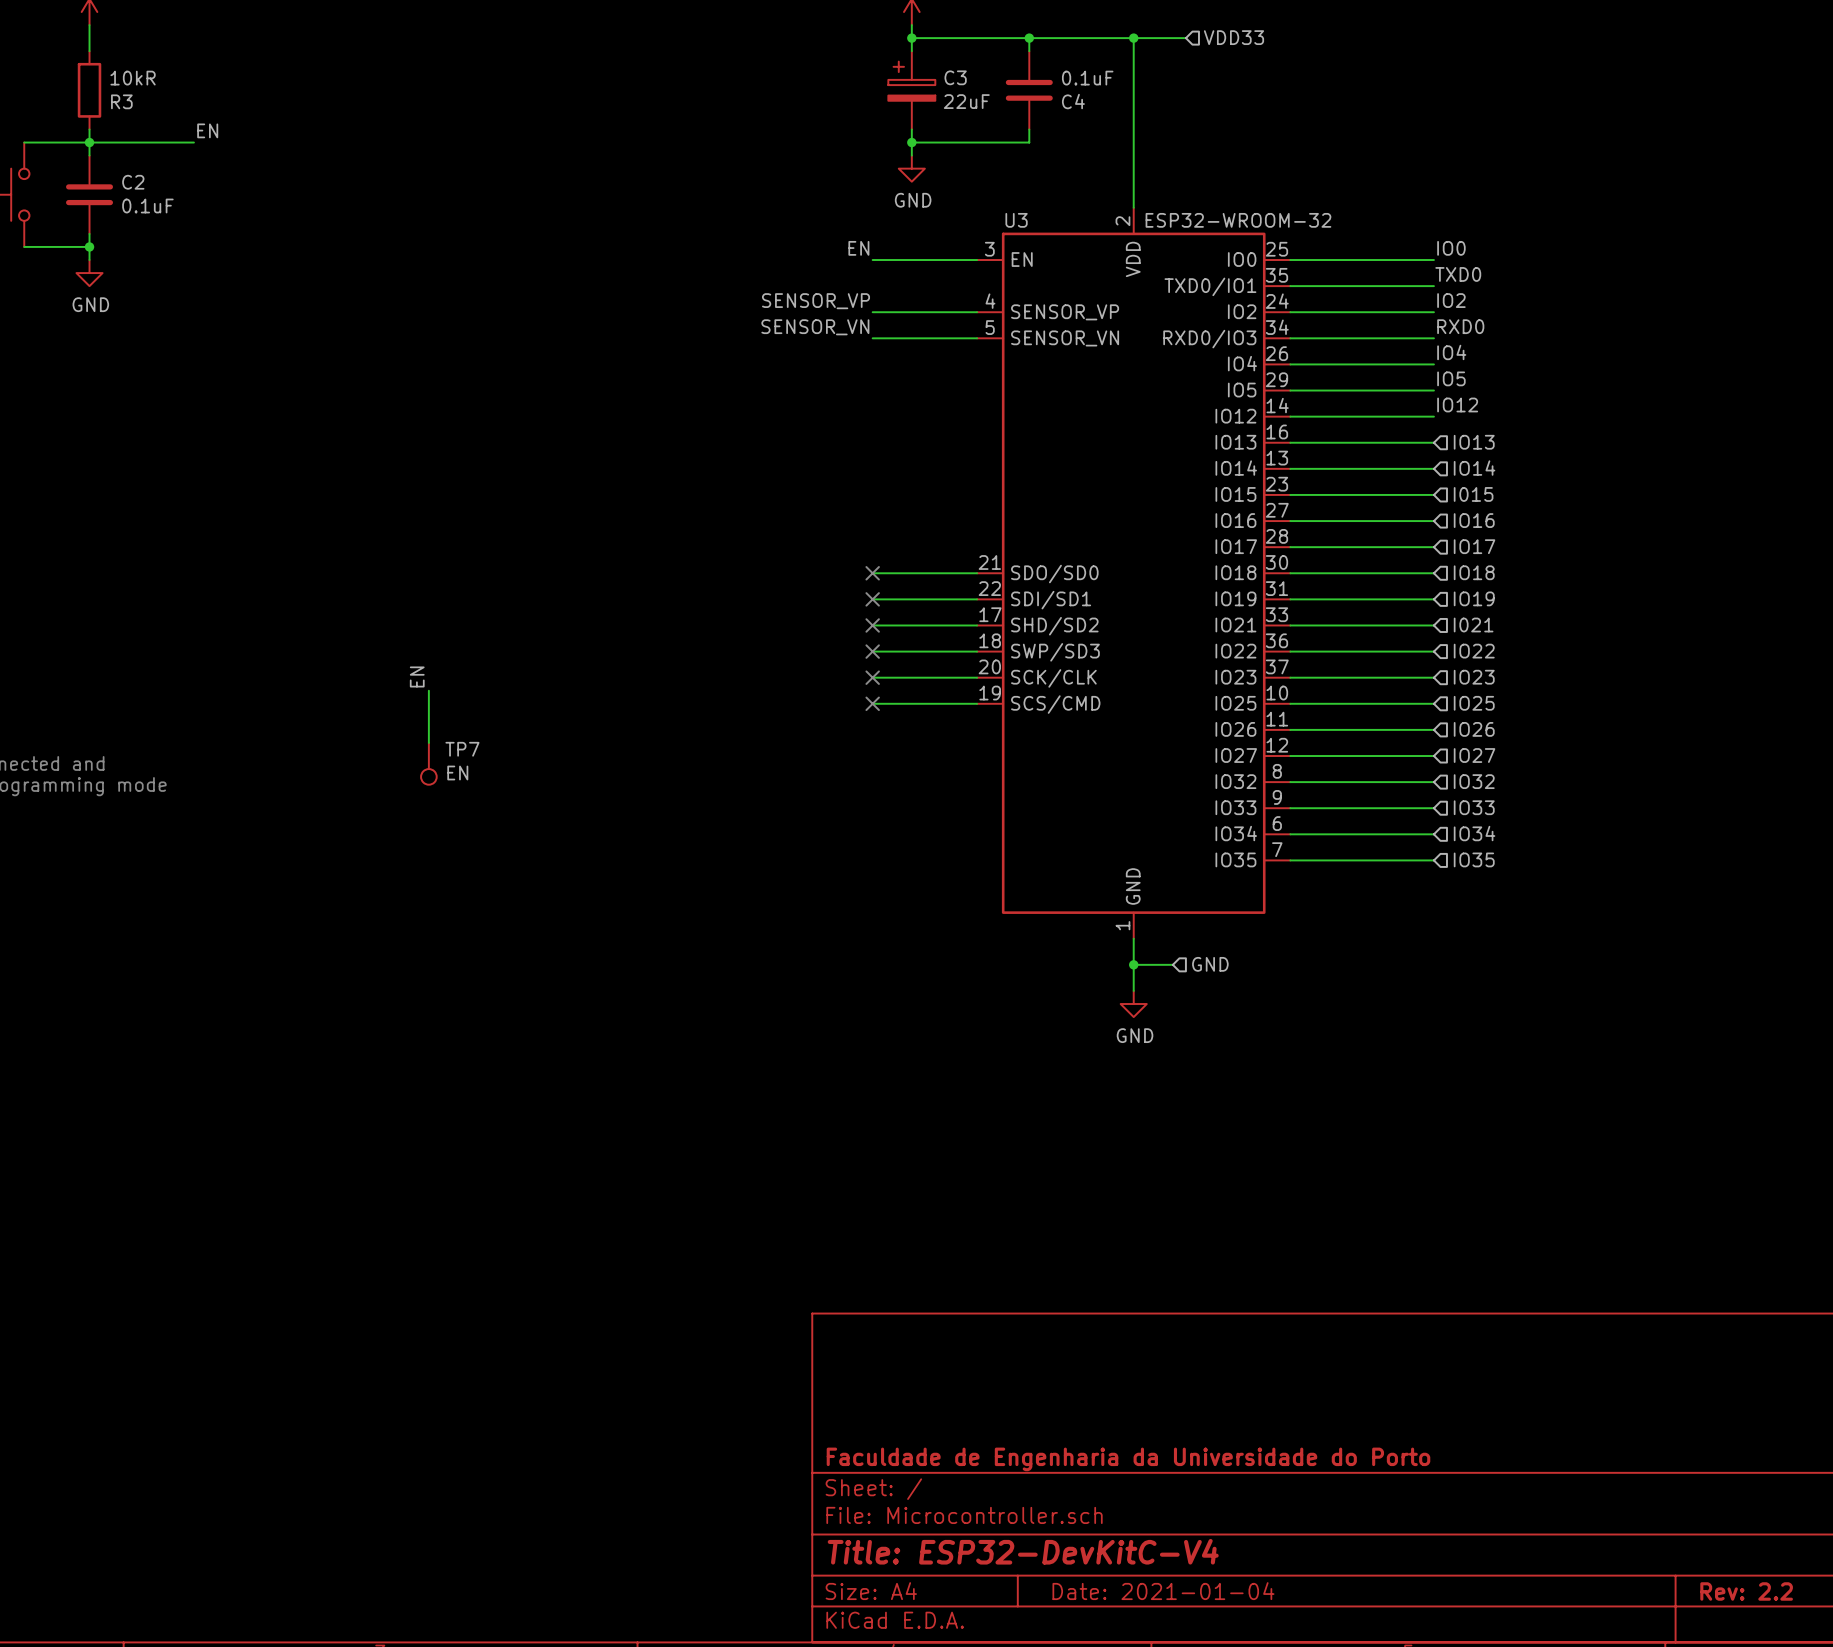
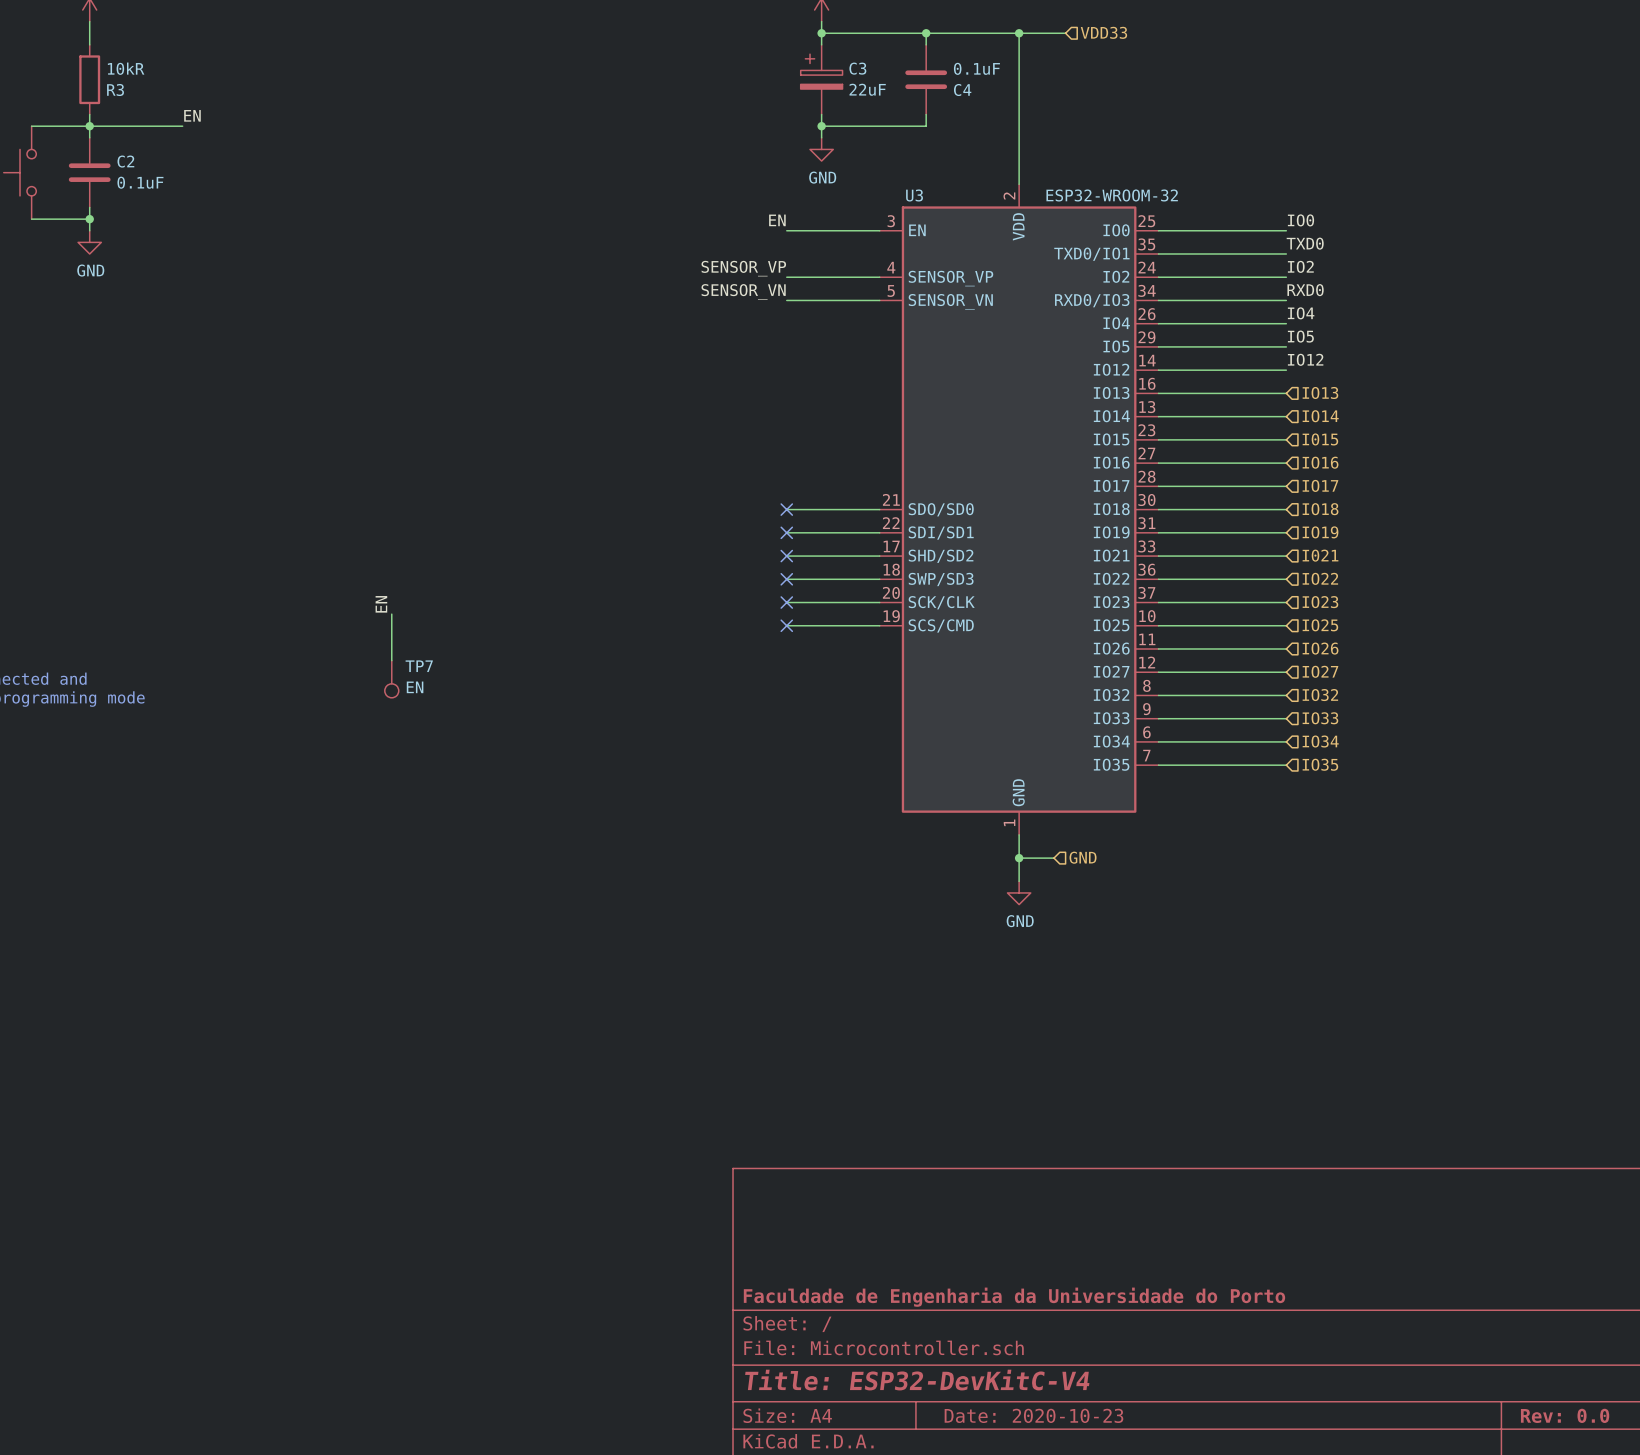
title block: Date: 2021-01-04 (1163, 1591) -> Date: 2020-10-23 (1033, 1415)
title block: Rev: 2.2 (1746, 1591) -> Rev: 0.0 (1565, 1415)

